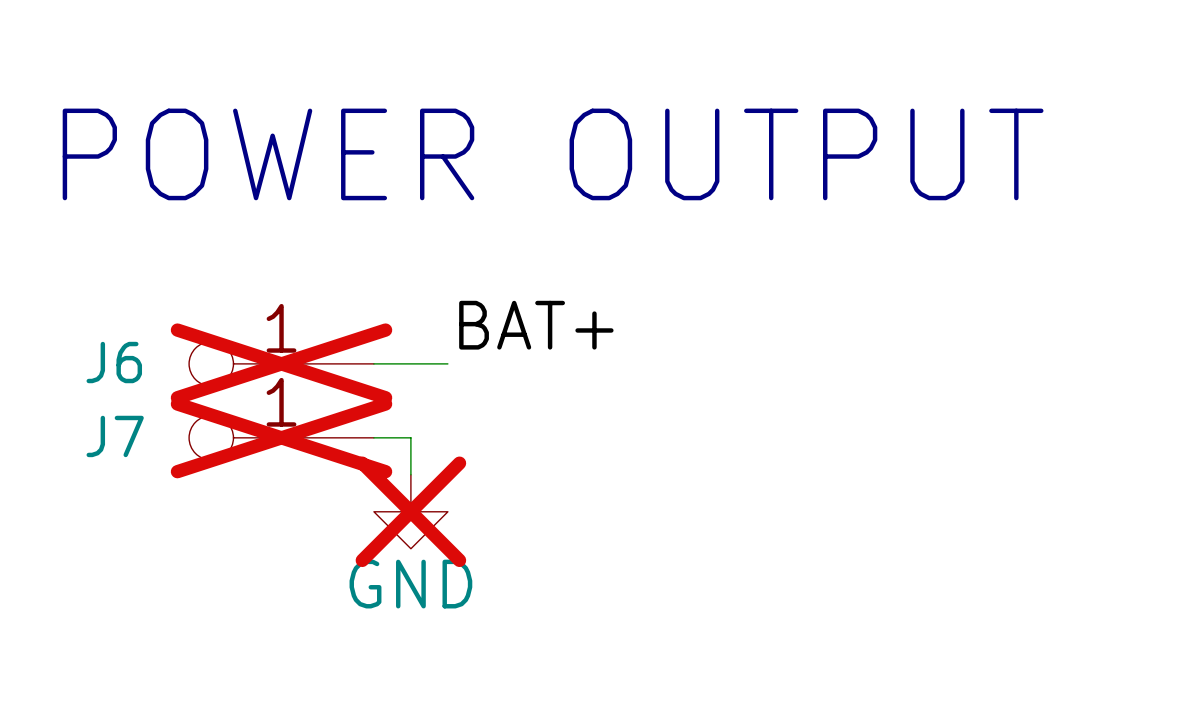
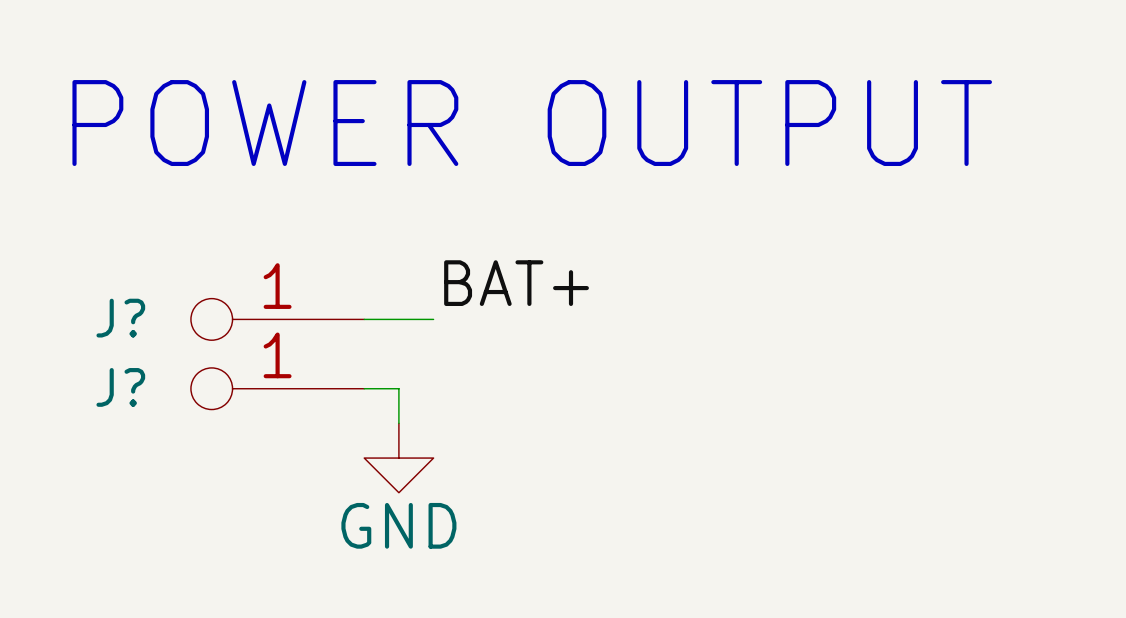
J6 name: J6 (114, 362) -> J? (120, 318)
J6 do-not-place cross: (281, 363) -> none
J7 name: J7 (115, 436) -> J? (120, 387)
J7 do-not-place cross: (281, 437) -> none
power symbol do-not-place cross: (410, 511) -> none

